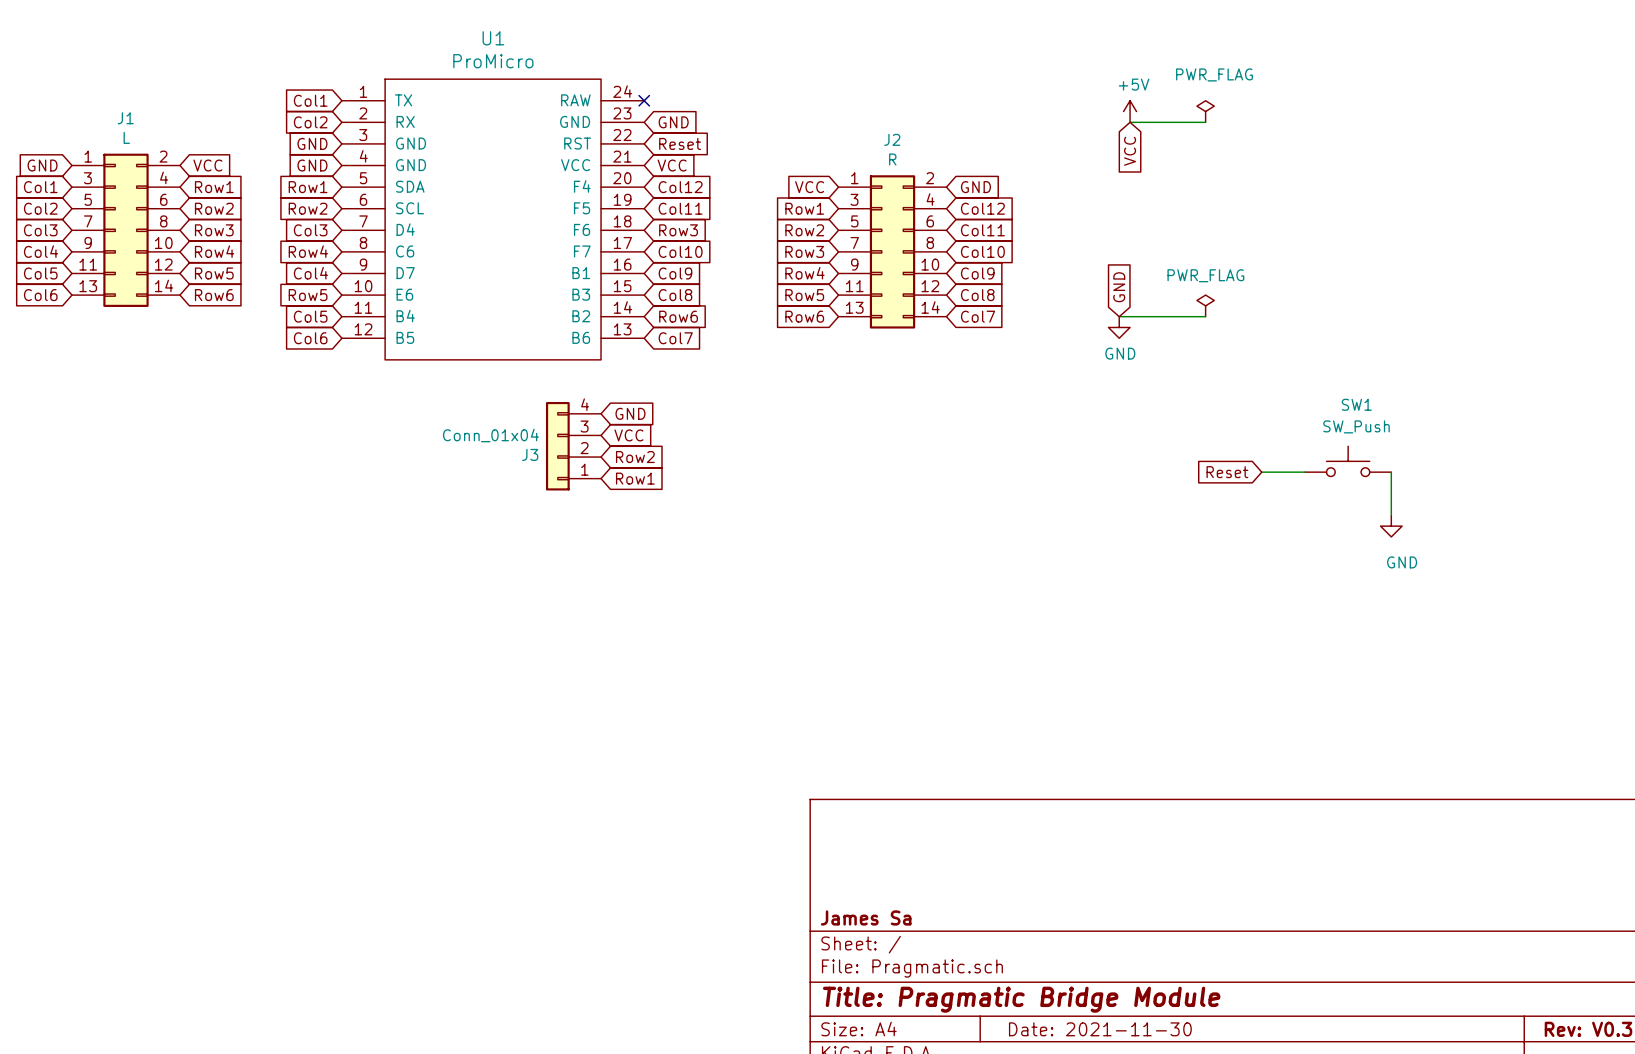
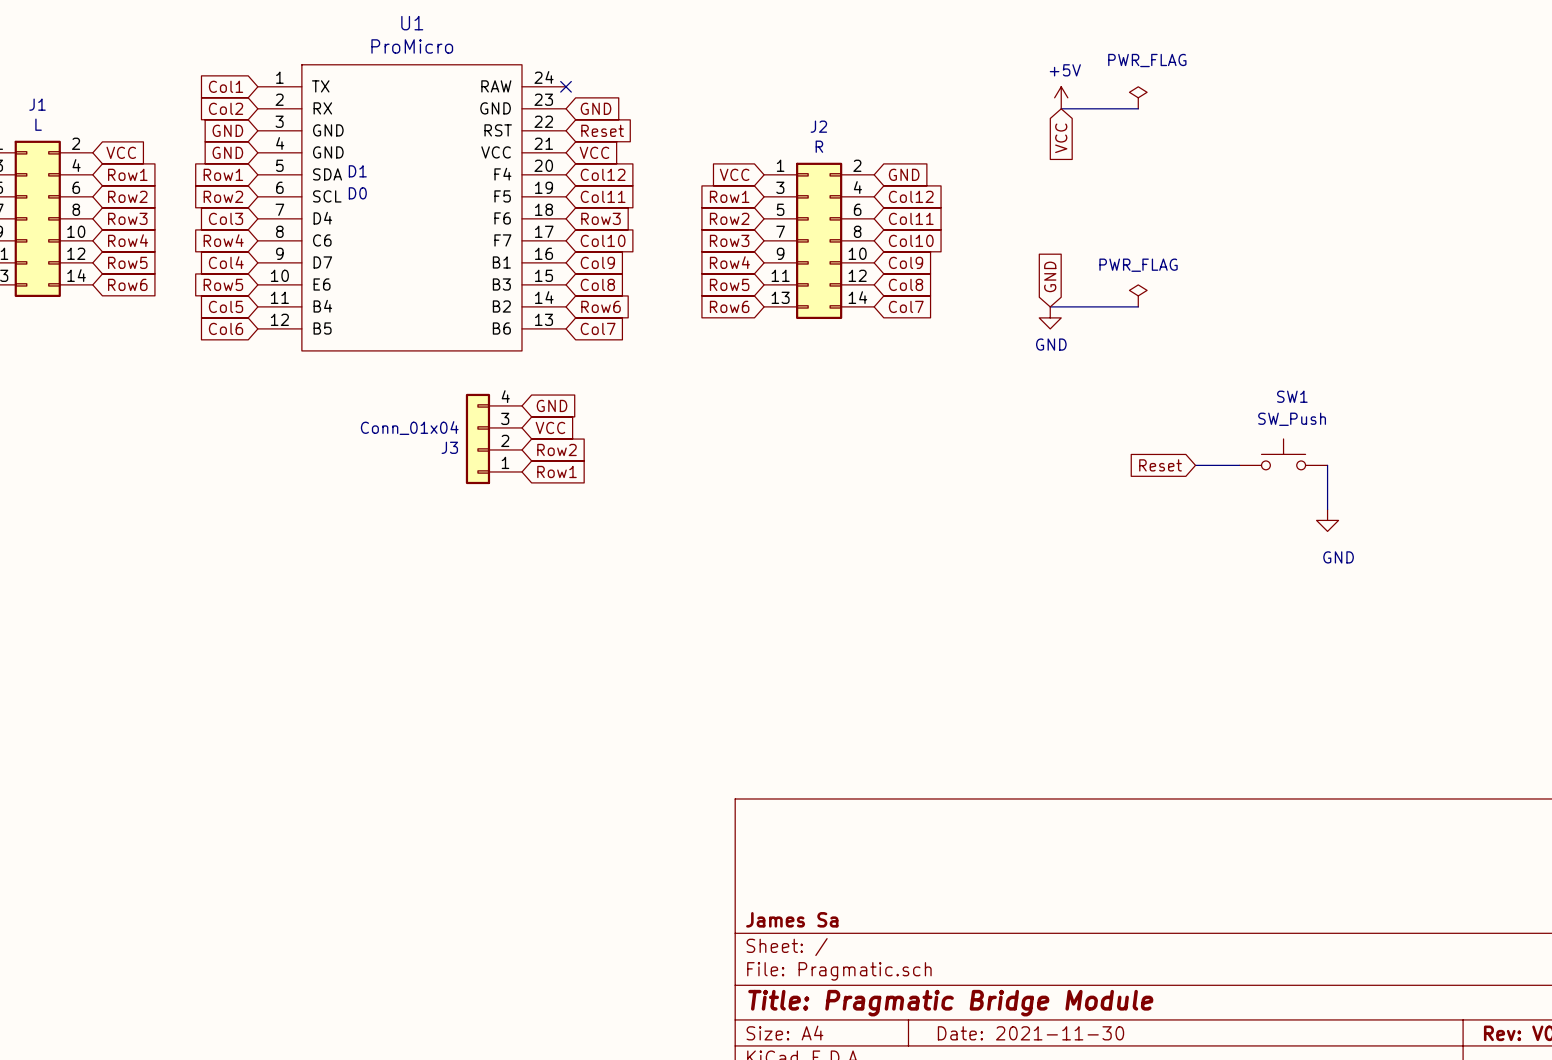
text: none -> D1 (357, 171)
text: none -> D0 (357, 193)

